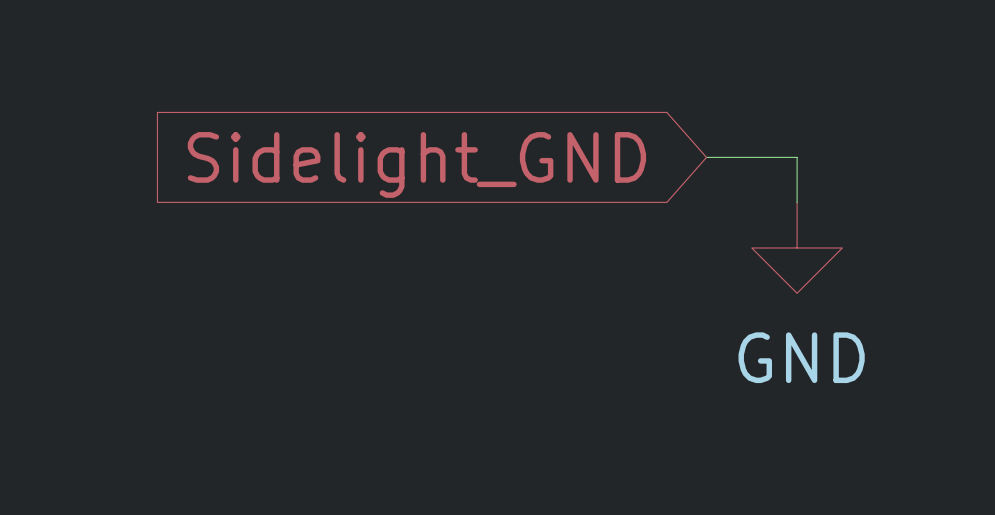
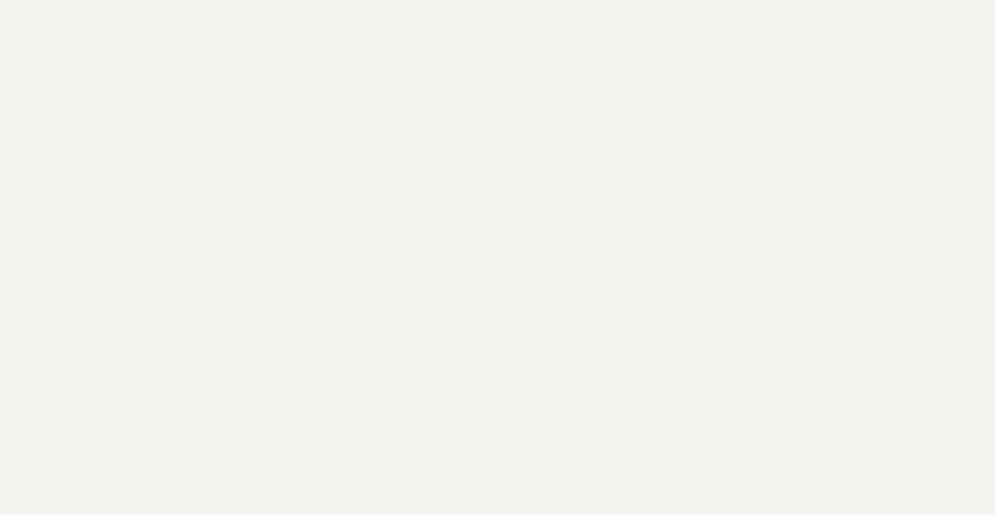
wire: (706, 157) (797, 157) (797, 202) -> none
global label: Sidelight_GND (416, 164) -> none
power symbol: GND (797, 247) -> none

